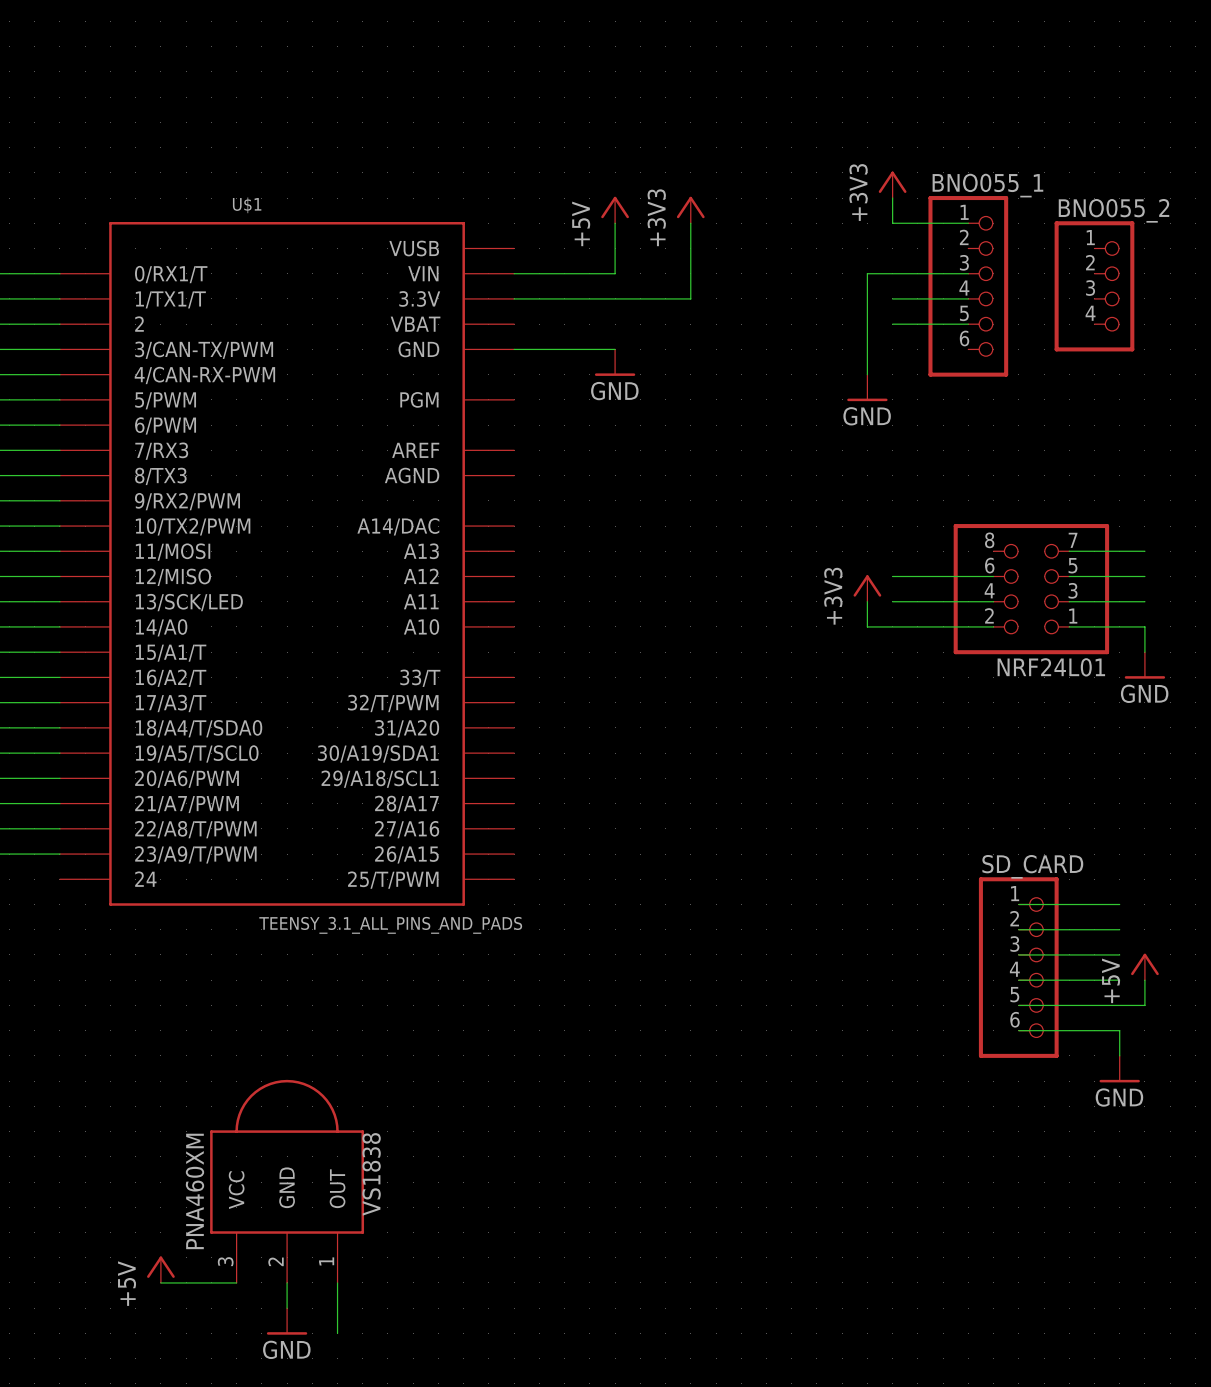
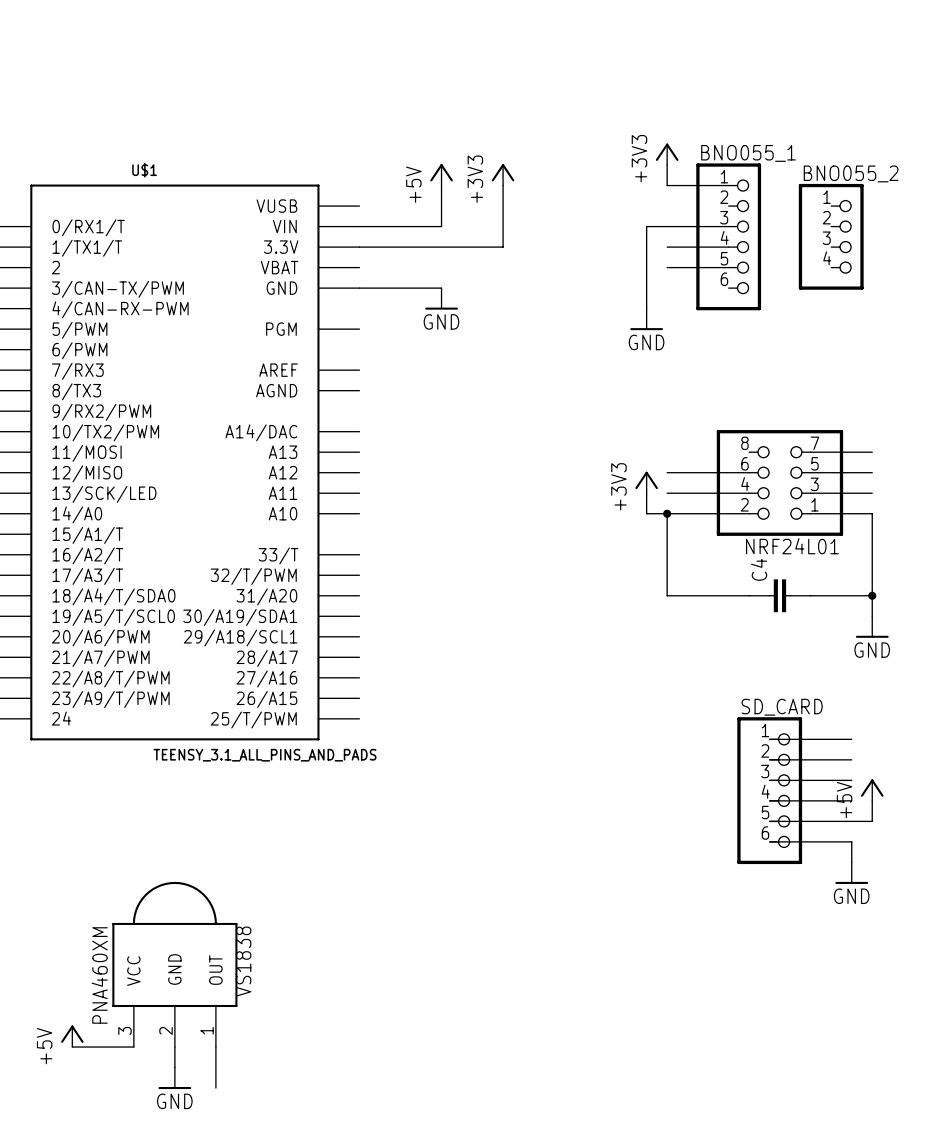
wire: none -> (667, 513) (667, 595) (749, 595)
junction: none -> (667, 513)
wire: none -> (872, 534) (872, 616)
power symbol position: GND (1144, 665) -> GND (872, 627)
C4: none -> (779, 595)
wire: none -> (810, 595) (872, 595)
junction: none -> (872, 595)

